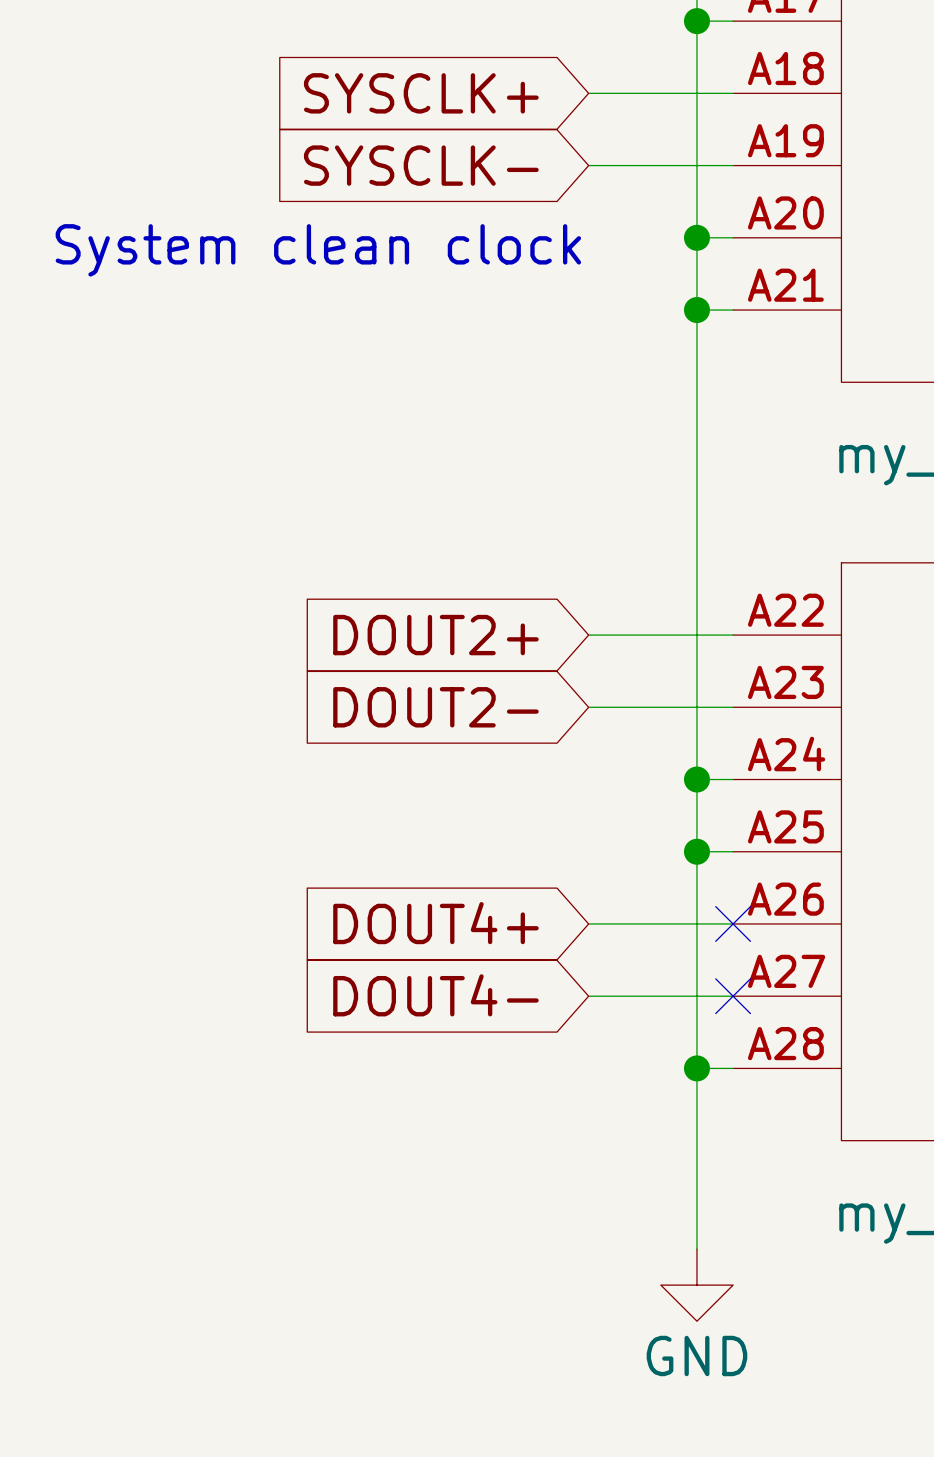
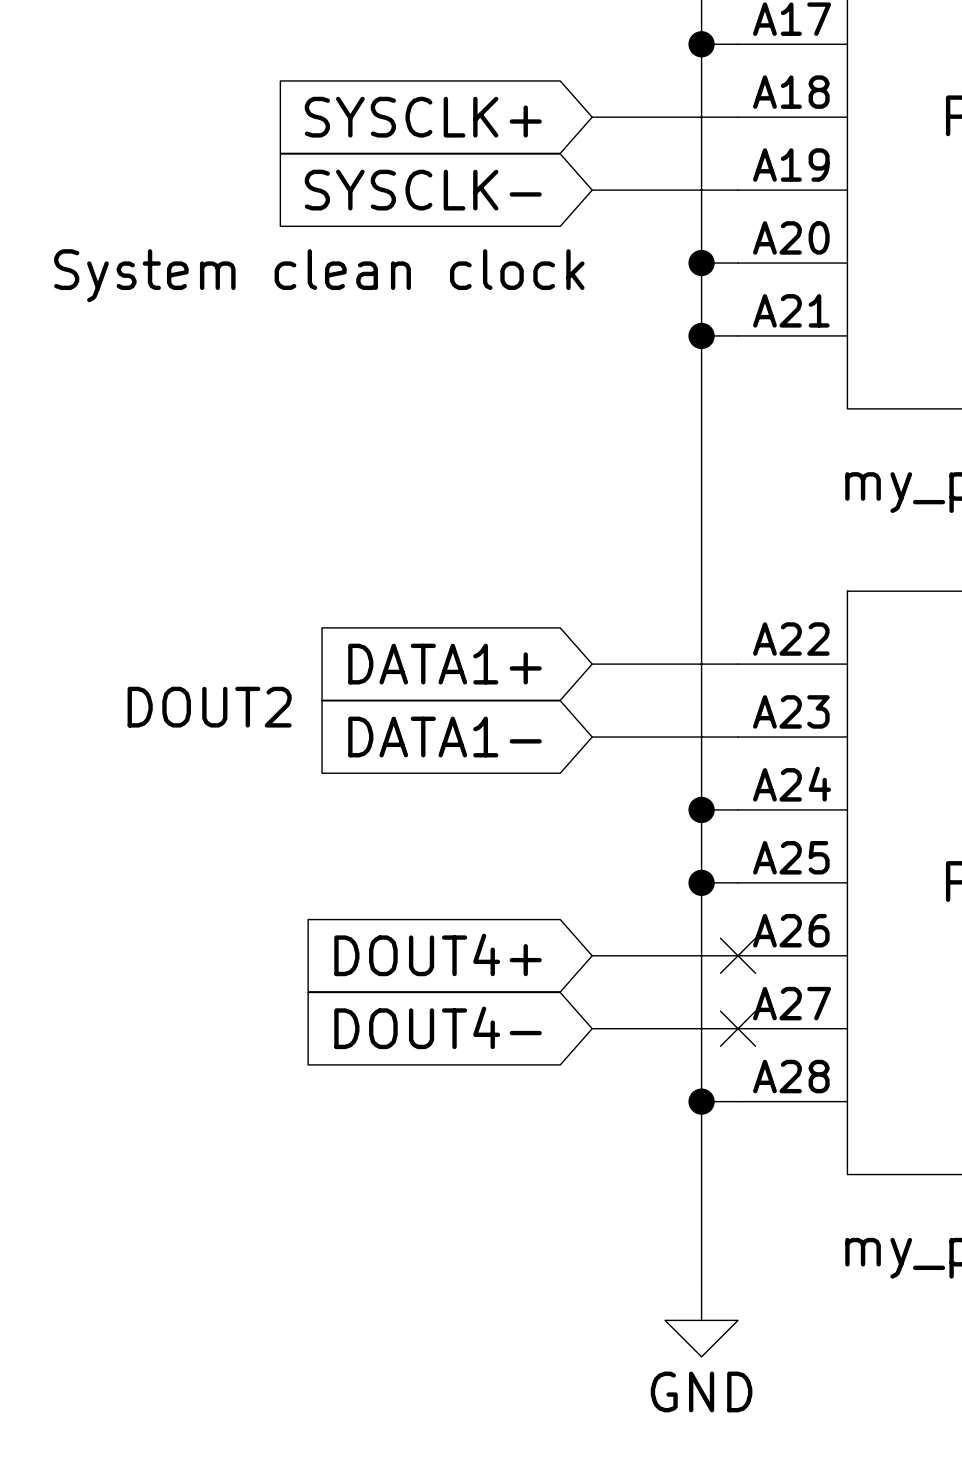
global label: DOUT2+ (435, 635) -> DATA1+ (444, 664)
text: none -> DOUT2 (209, 707)
global label: DOUT2- (435, 707) -> DATA1- (444, 737)

